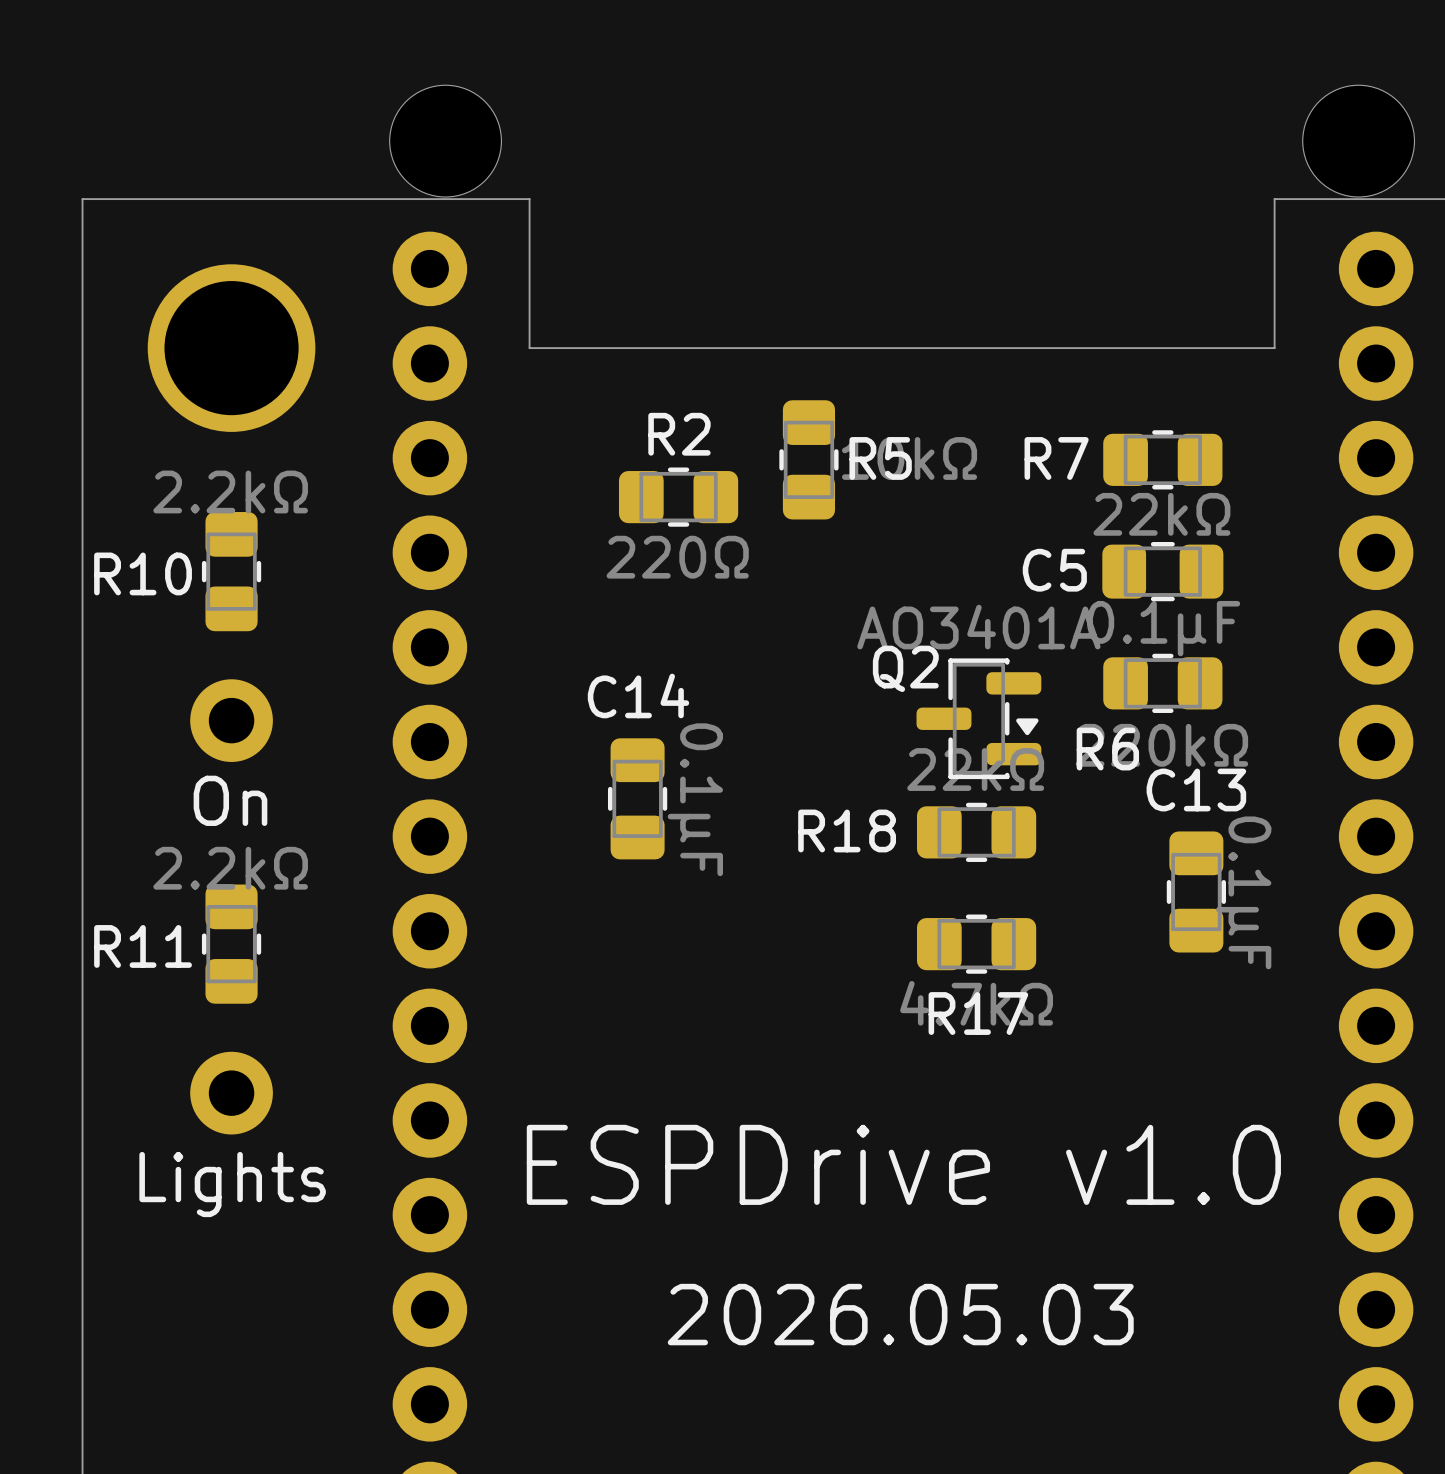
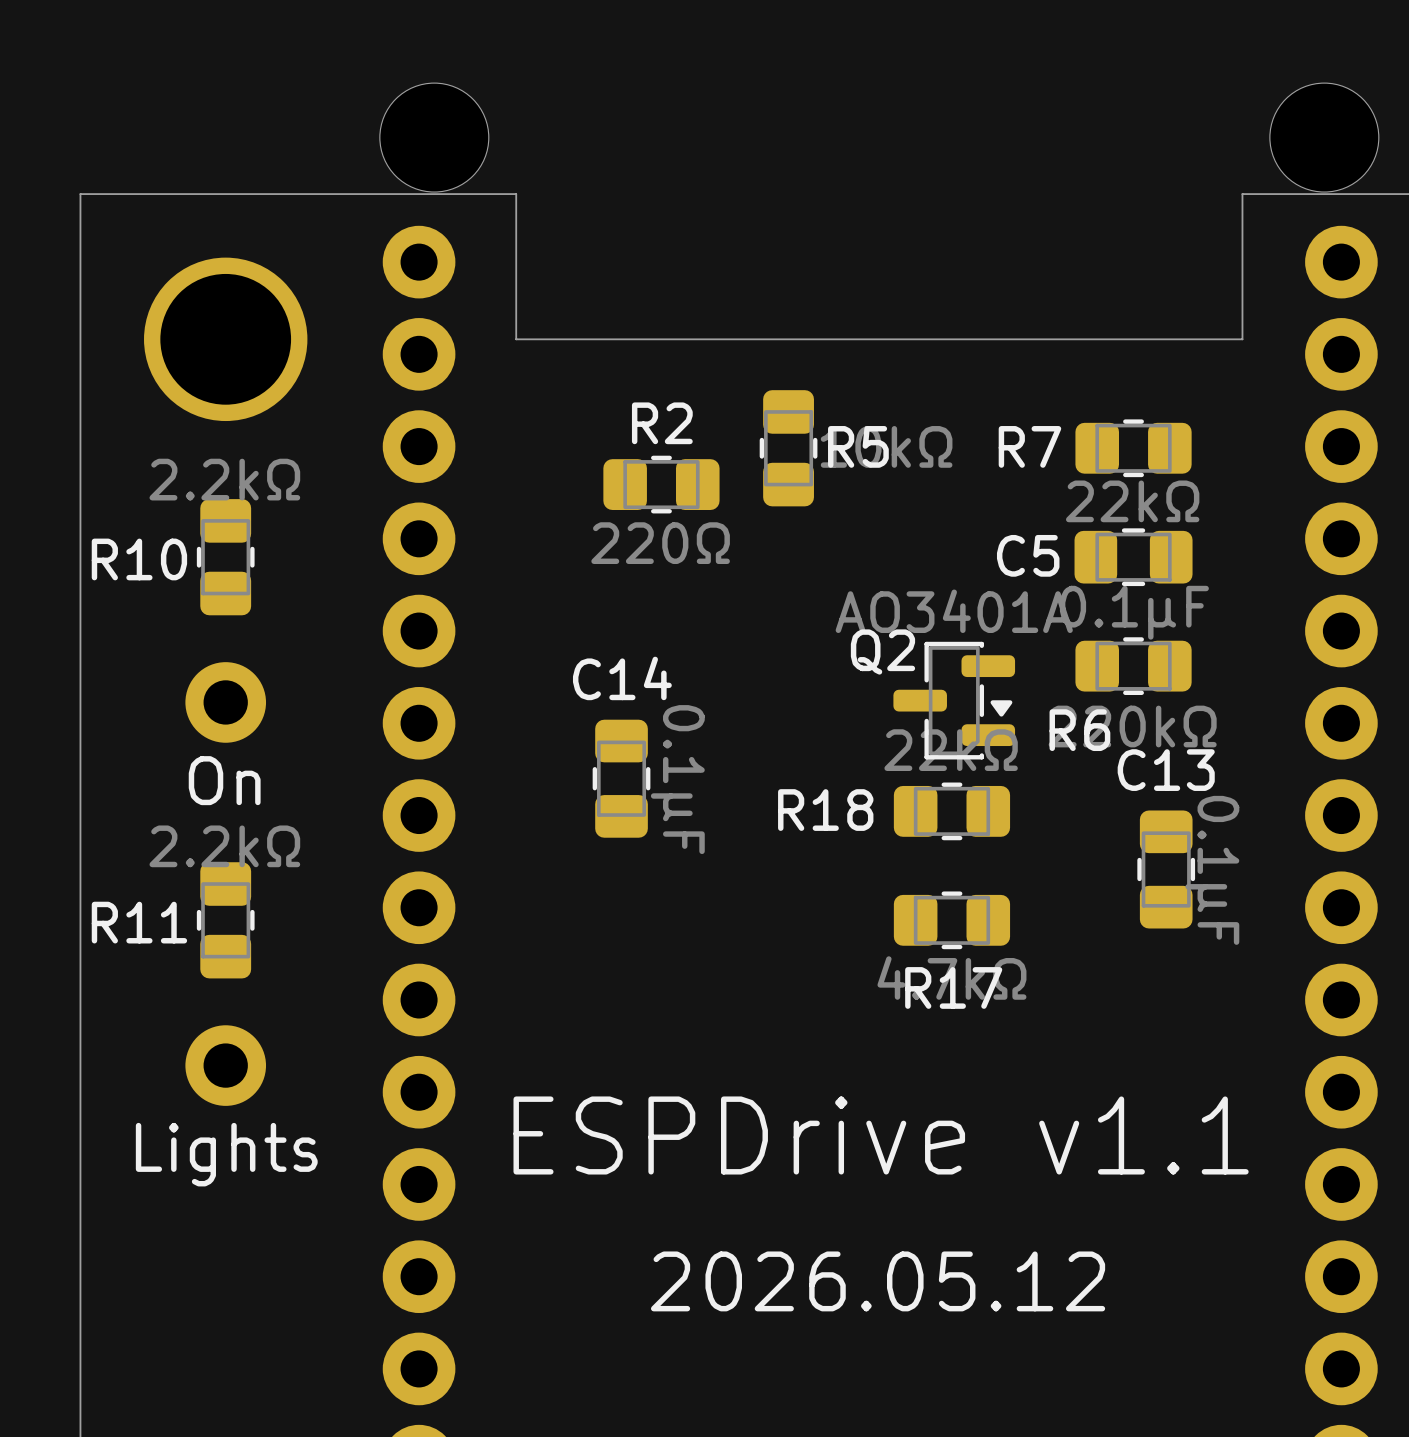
text: ESPDrive v1.0 (903, 1164) -> ESPDrive v1.1 (881, 1135)
text: 2026.05.03 (900, 1314) -> 2026.05.12 (878, 1281)

